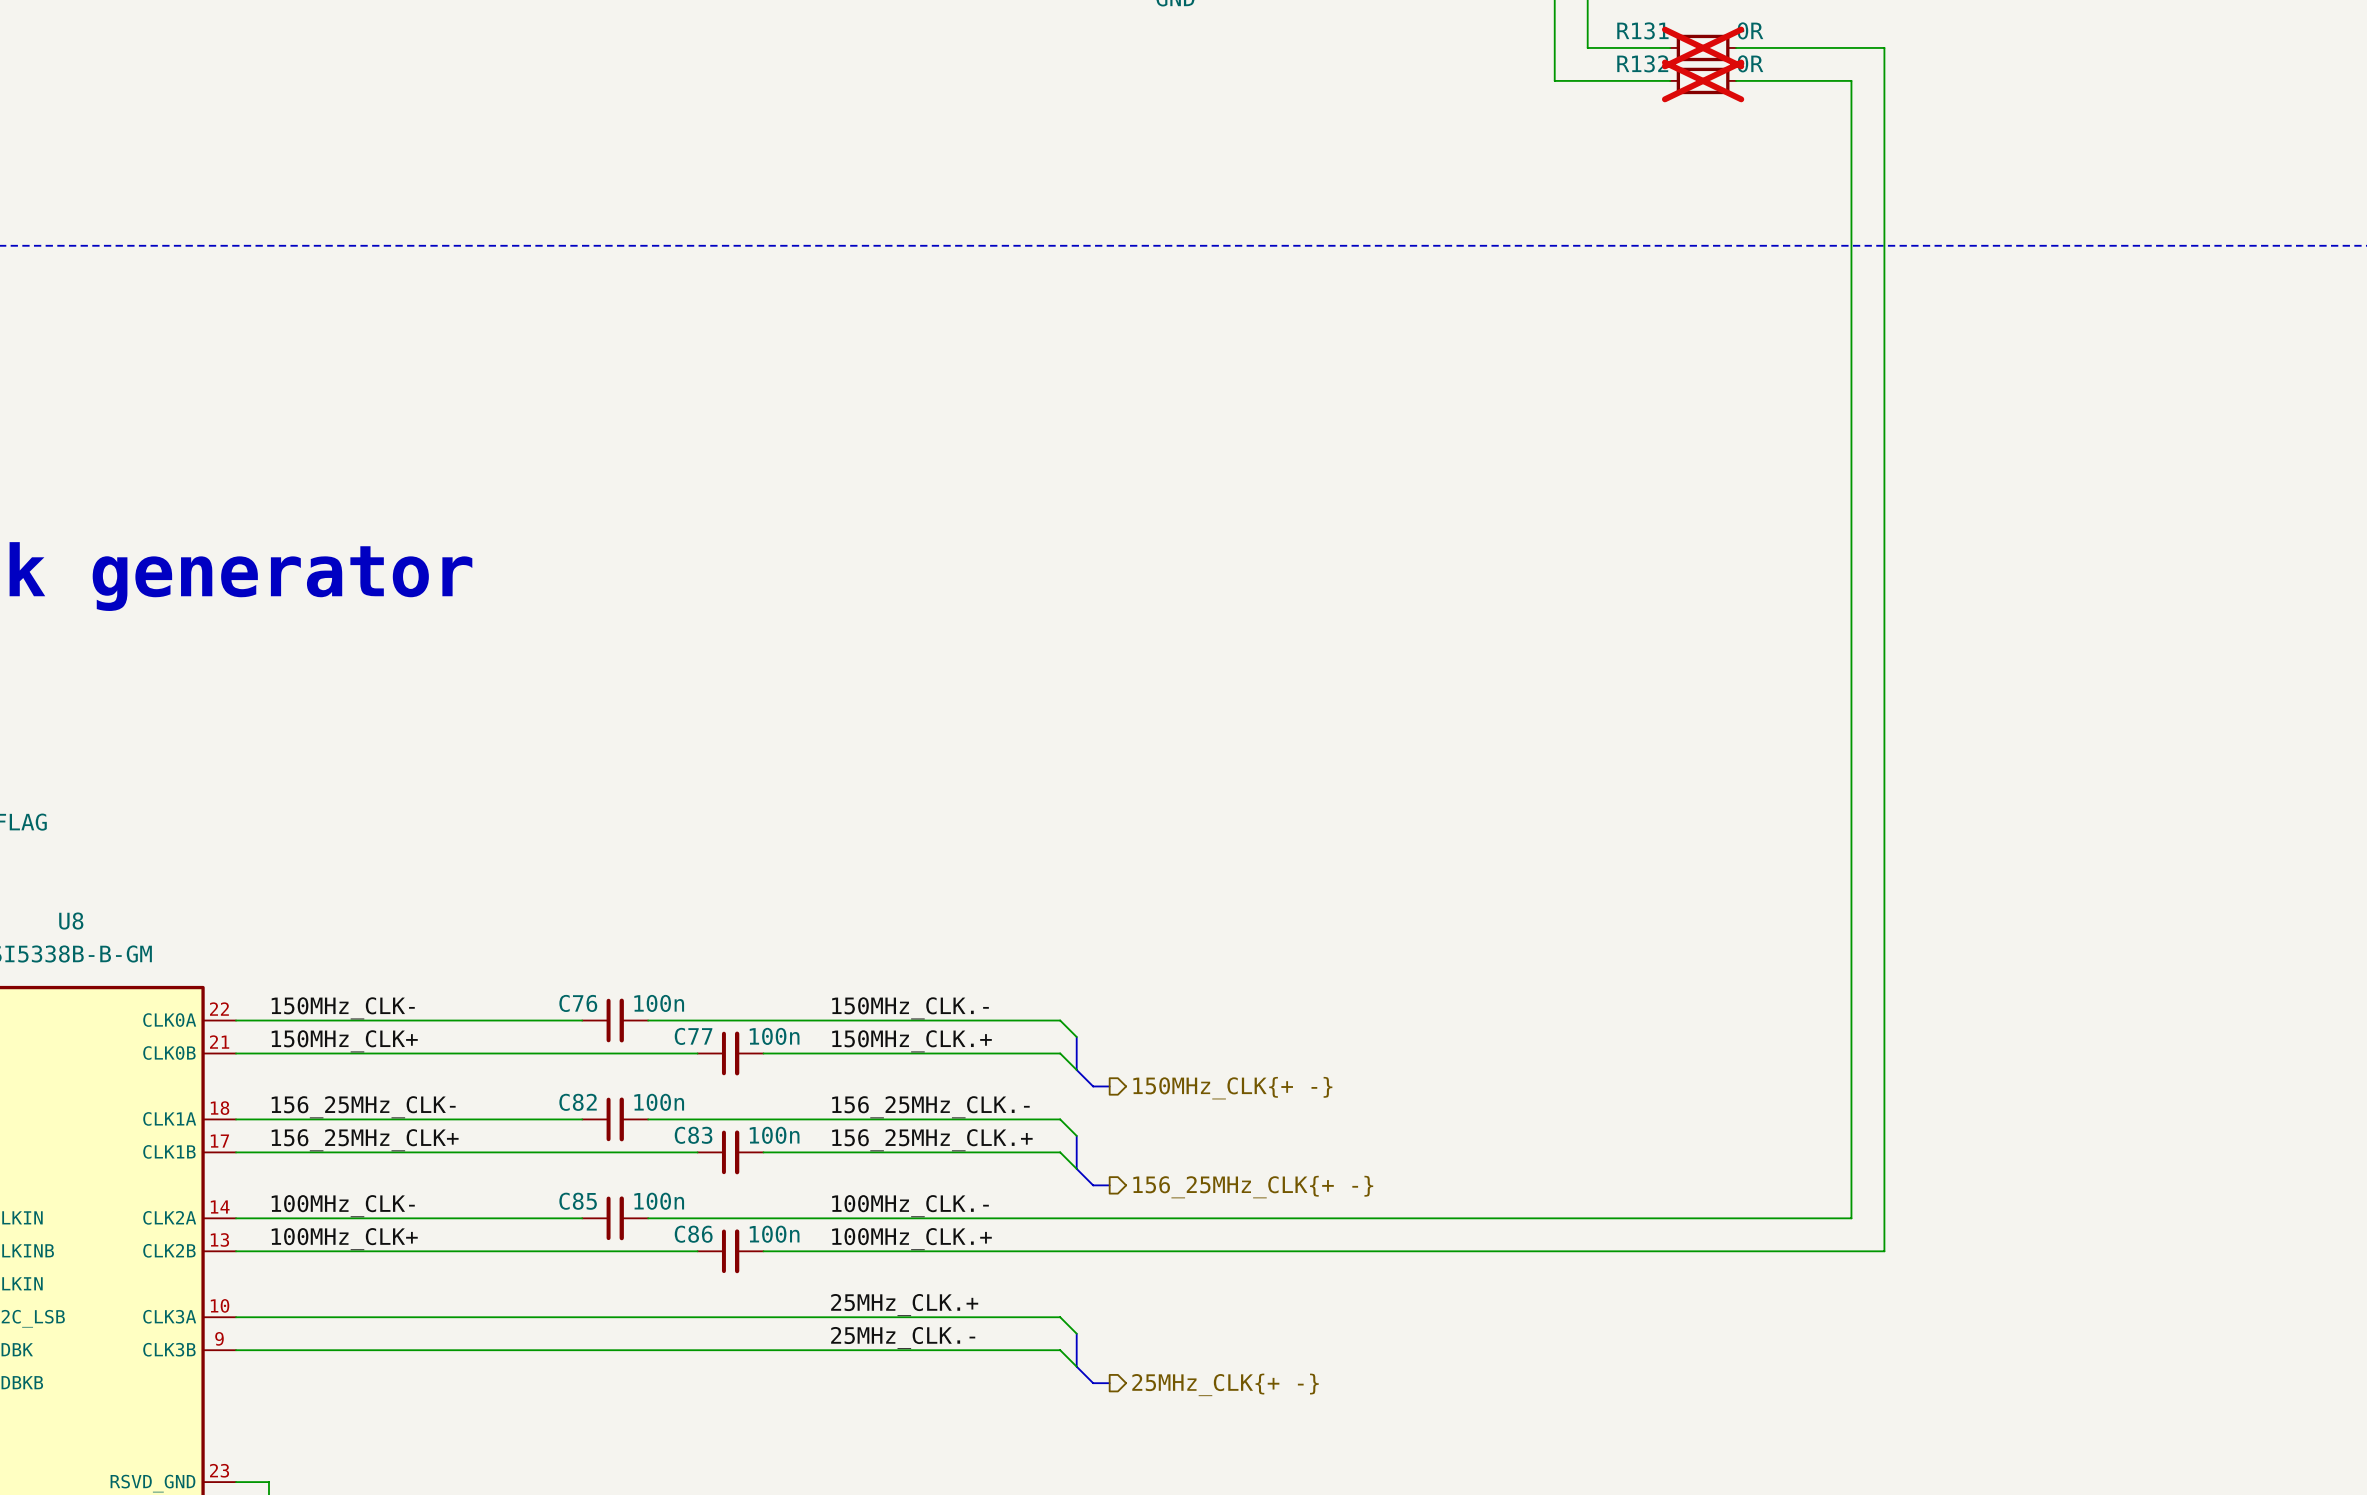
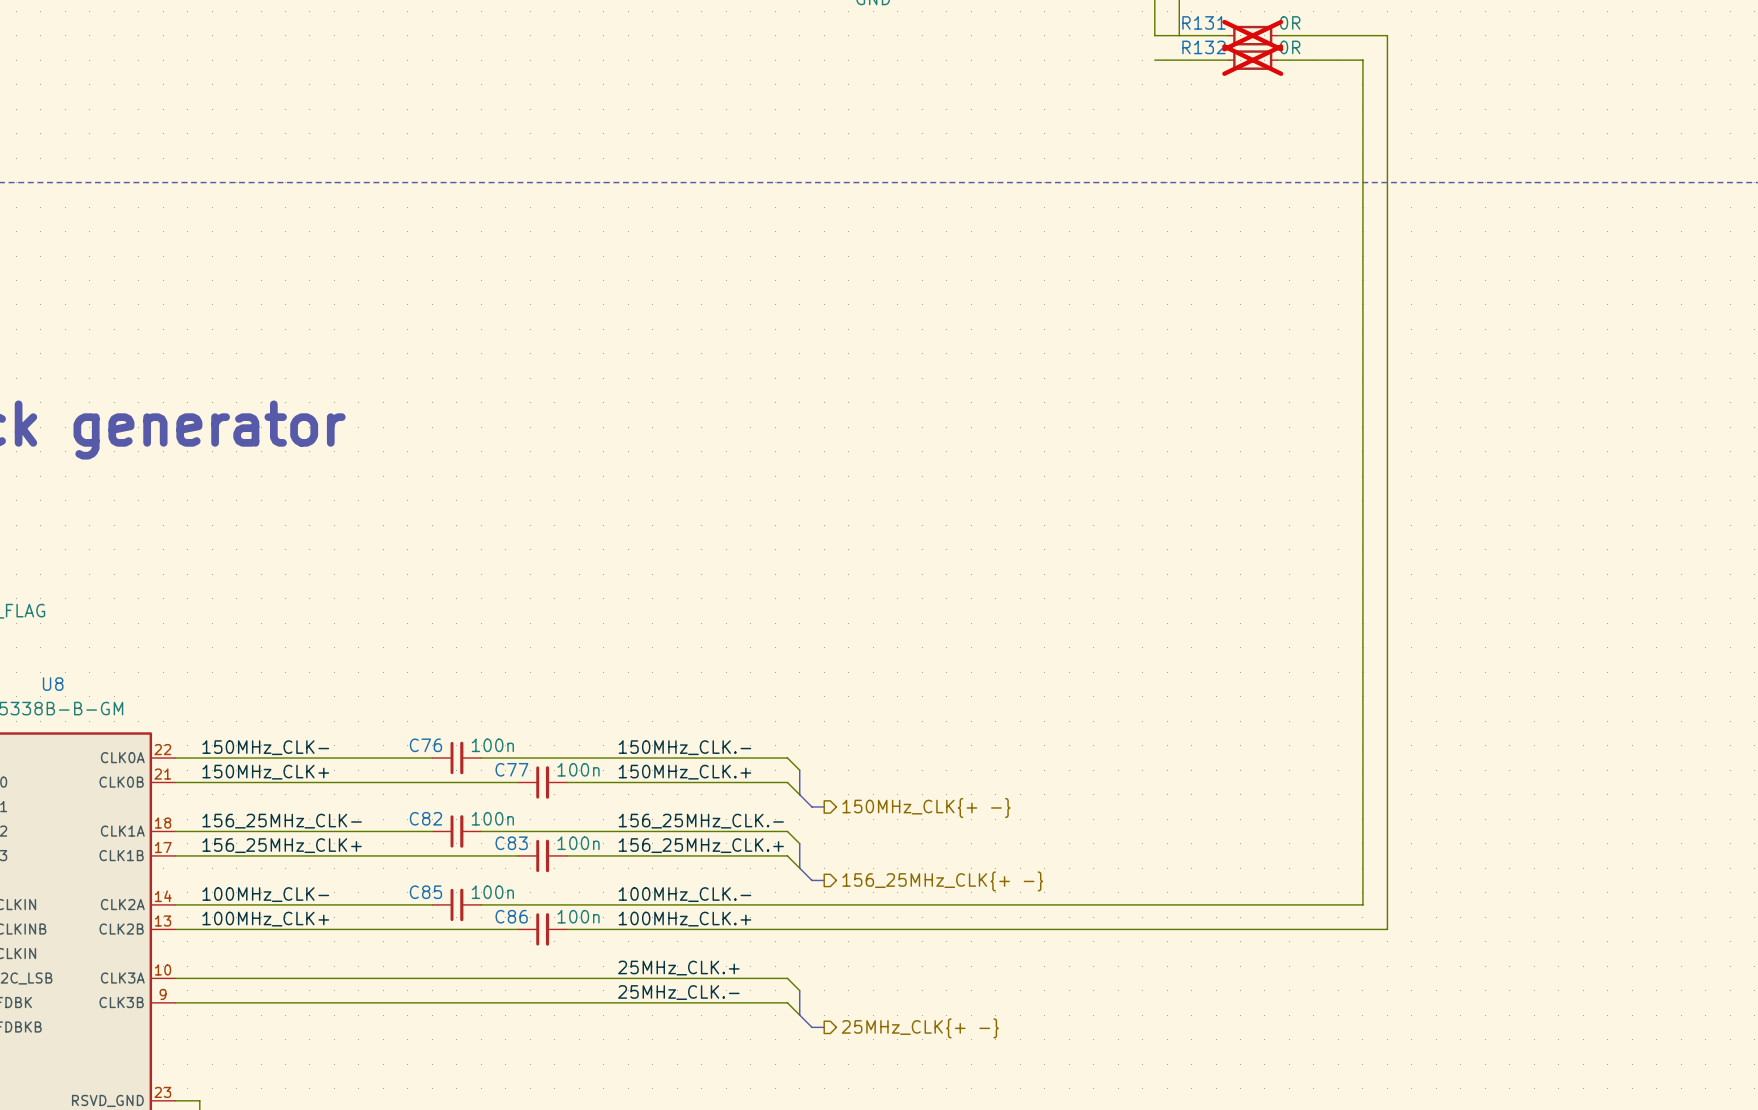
wire: (1554, 47) (1554, 80) -> (1154, 35) (1179, 35)
R131 position: (1703, 47) -> (1252, 35)
wire: (1867, 47) (1884, 47) (1884, 1251) (1867, 1251) -> (1387, 35) (1387, 929)
R132 position: (1703, 80) -> (1252, 60)
wire: (1834, 80) (1851, 80) (1851, 1218) (1834, 1218) -> (1362, 60) (1362, 904)

